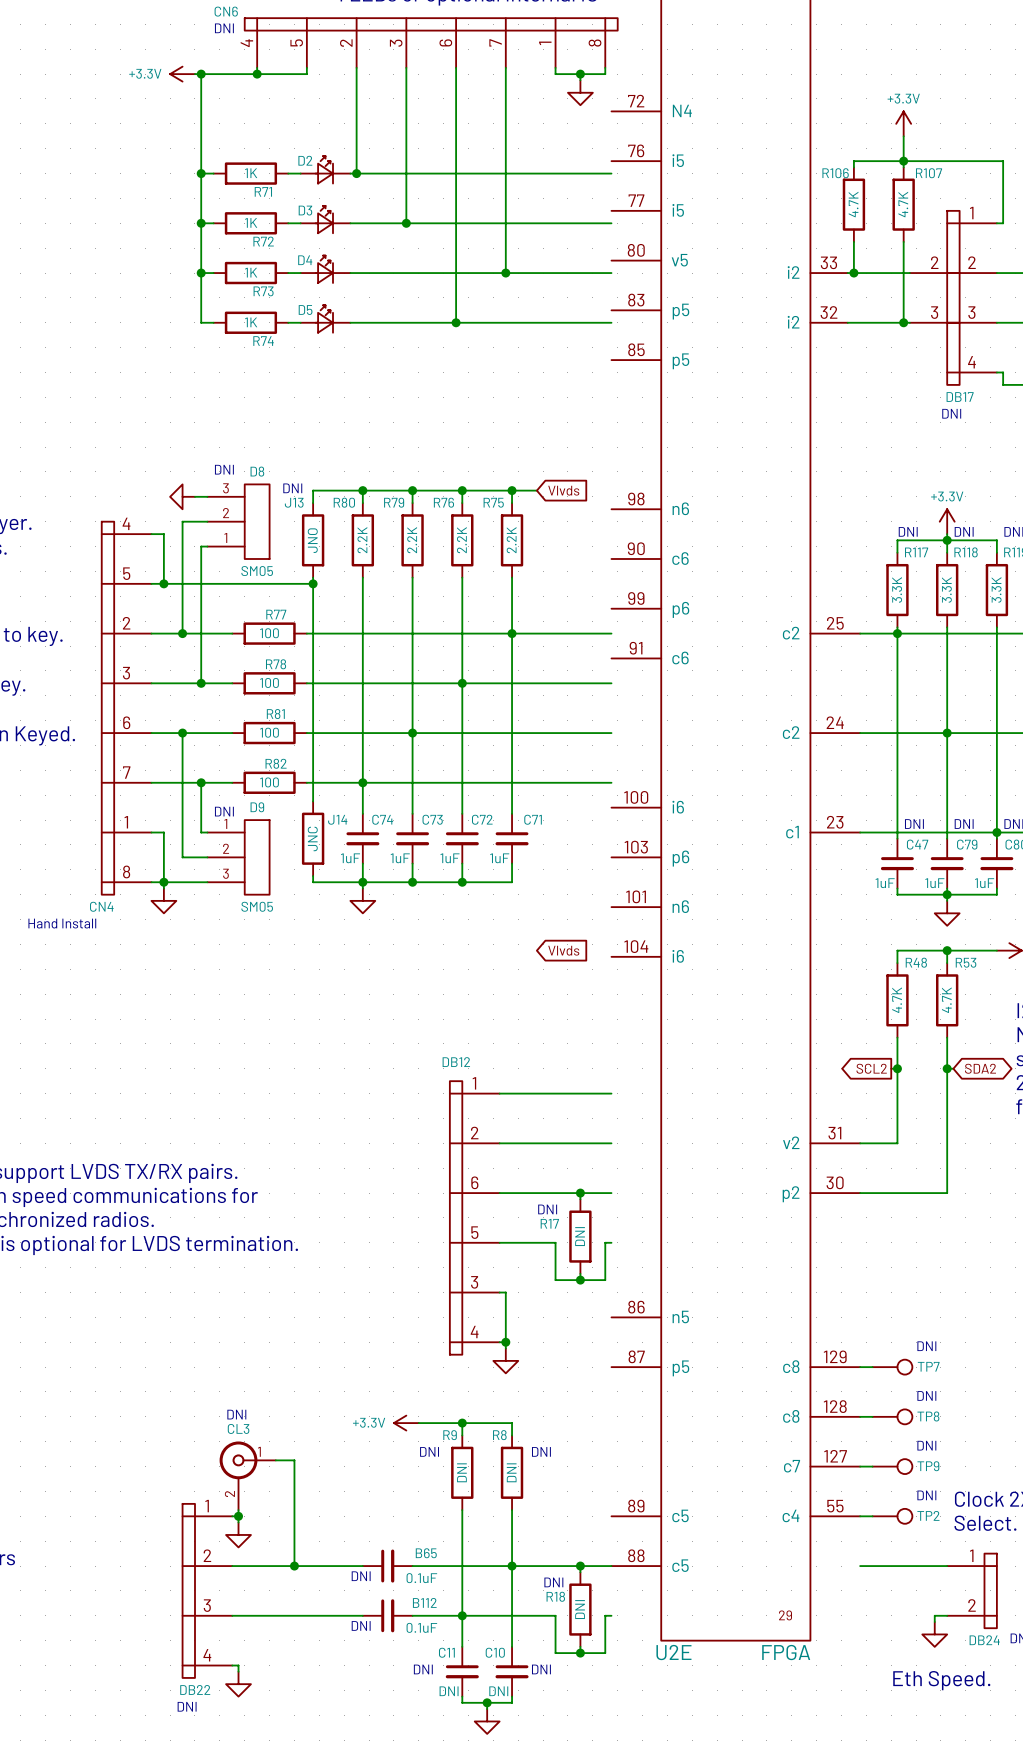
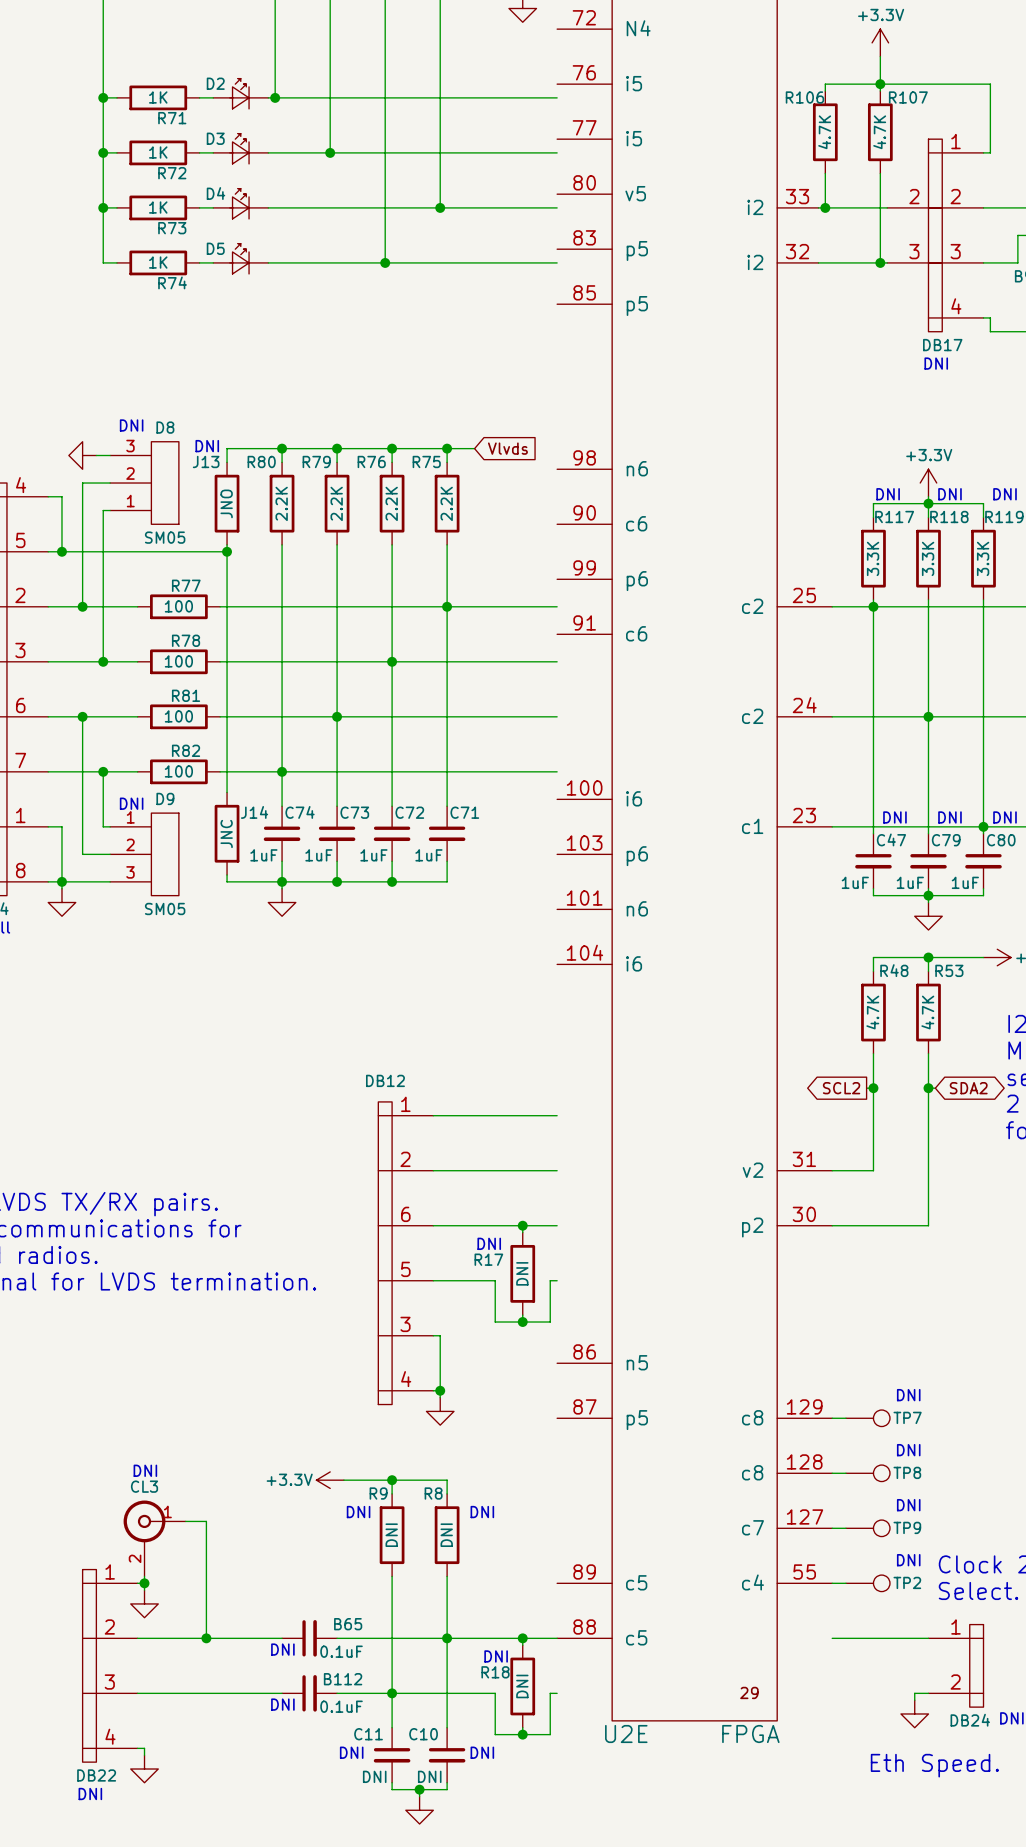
global label: Vlvds (563, 950) -> none

